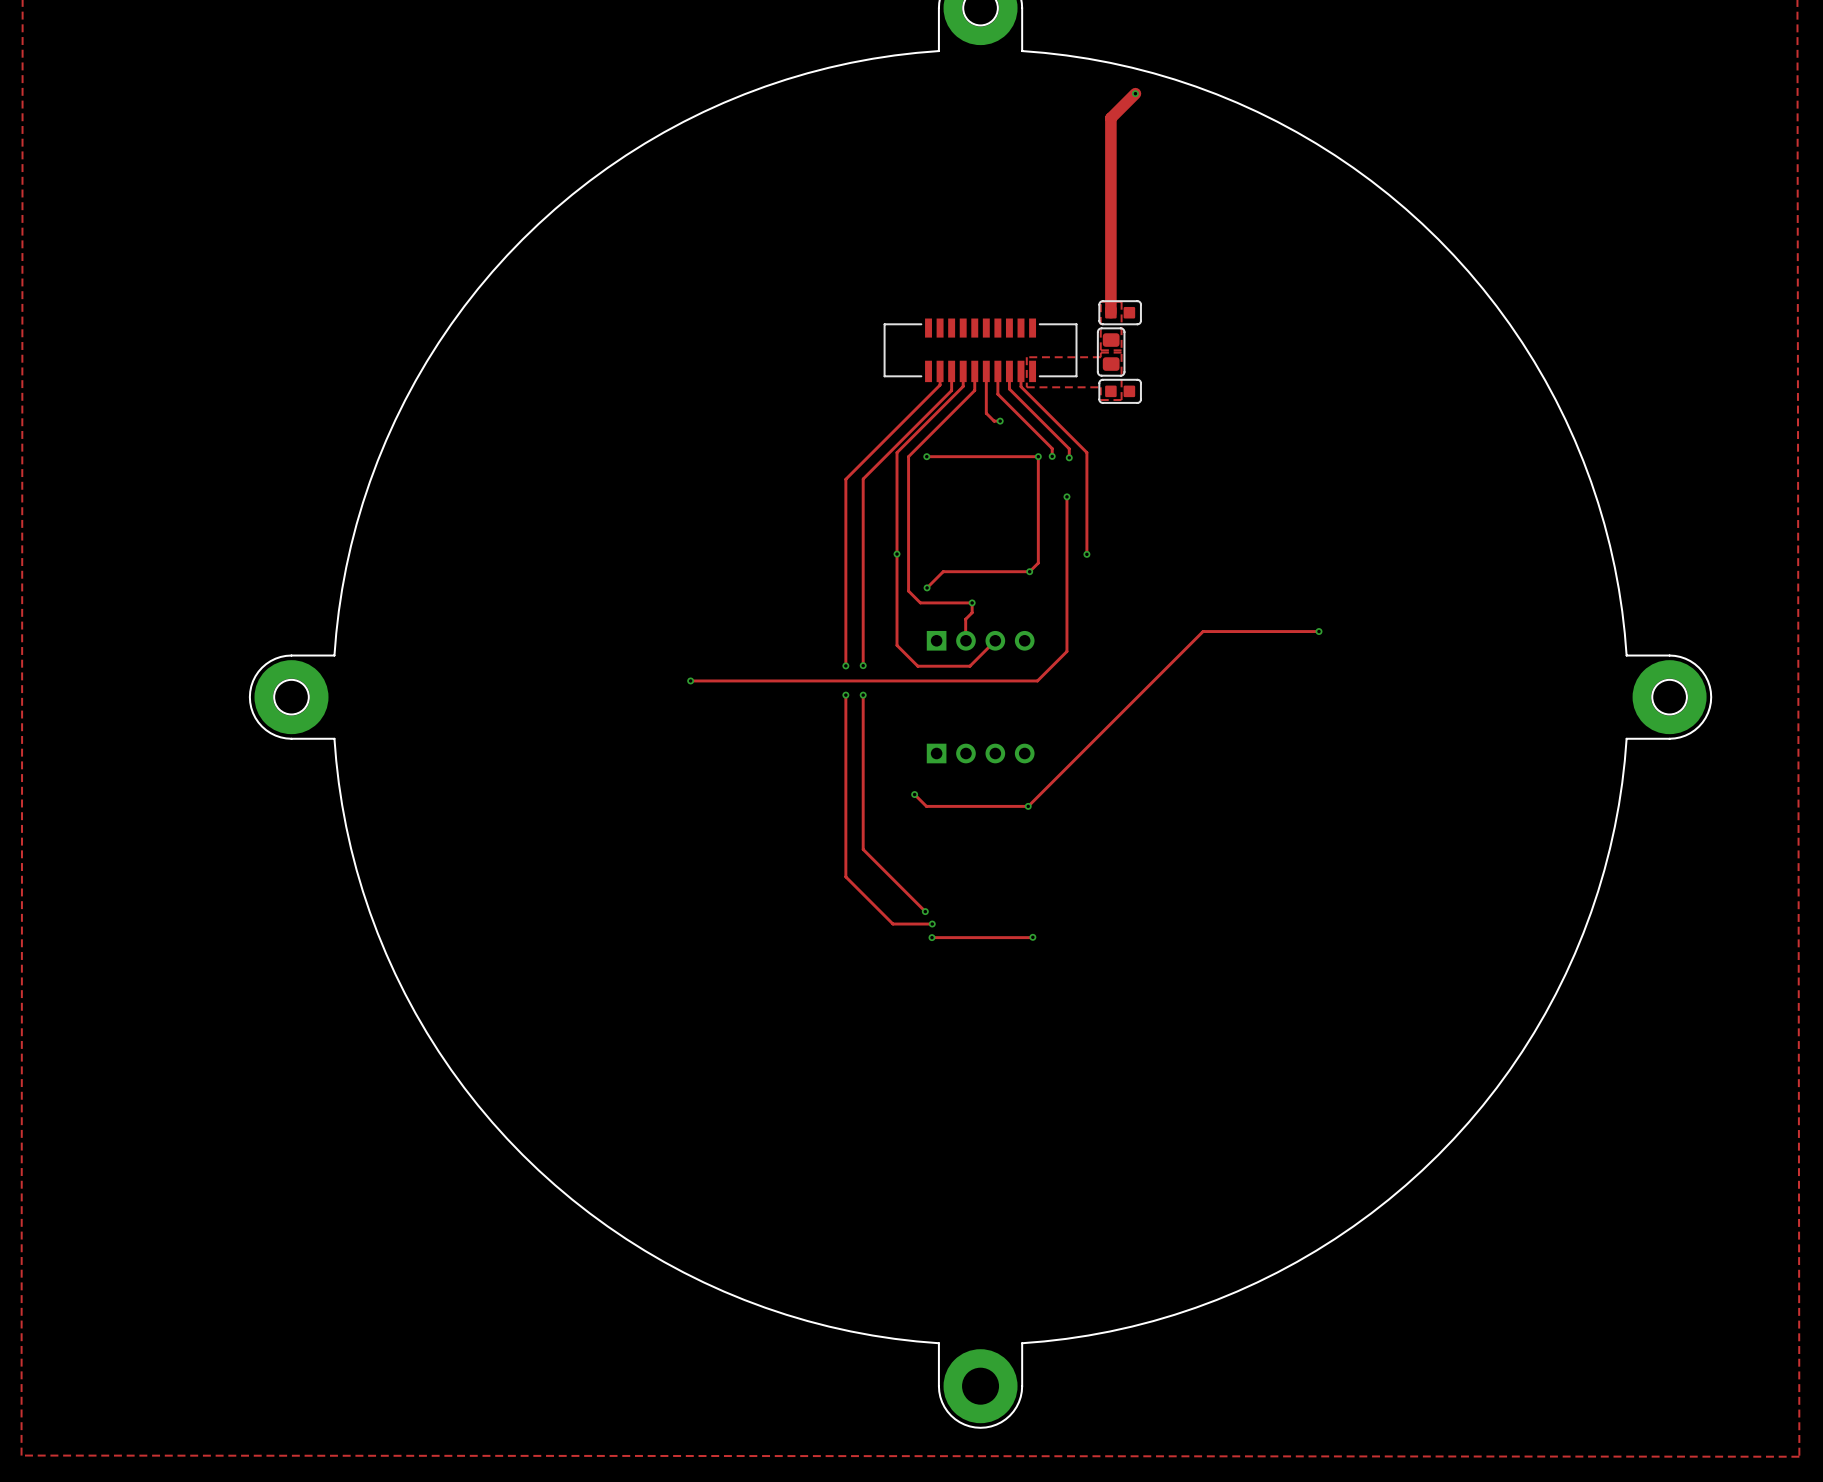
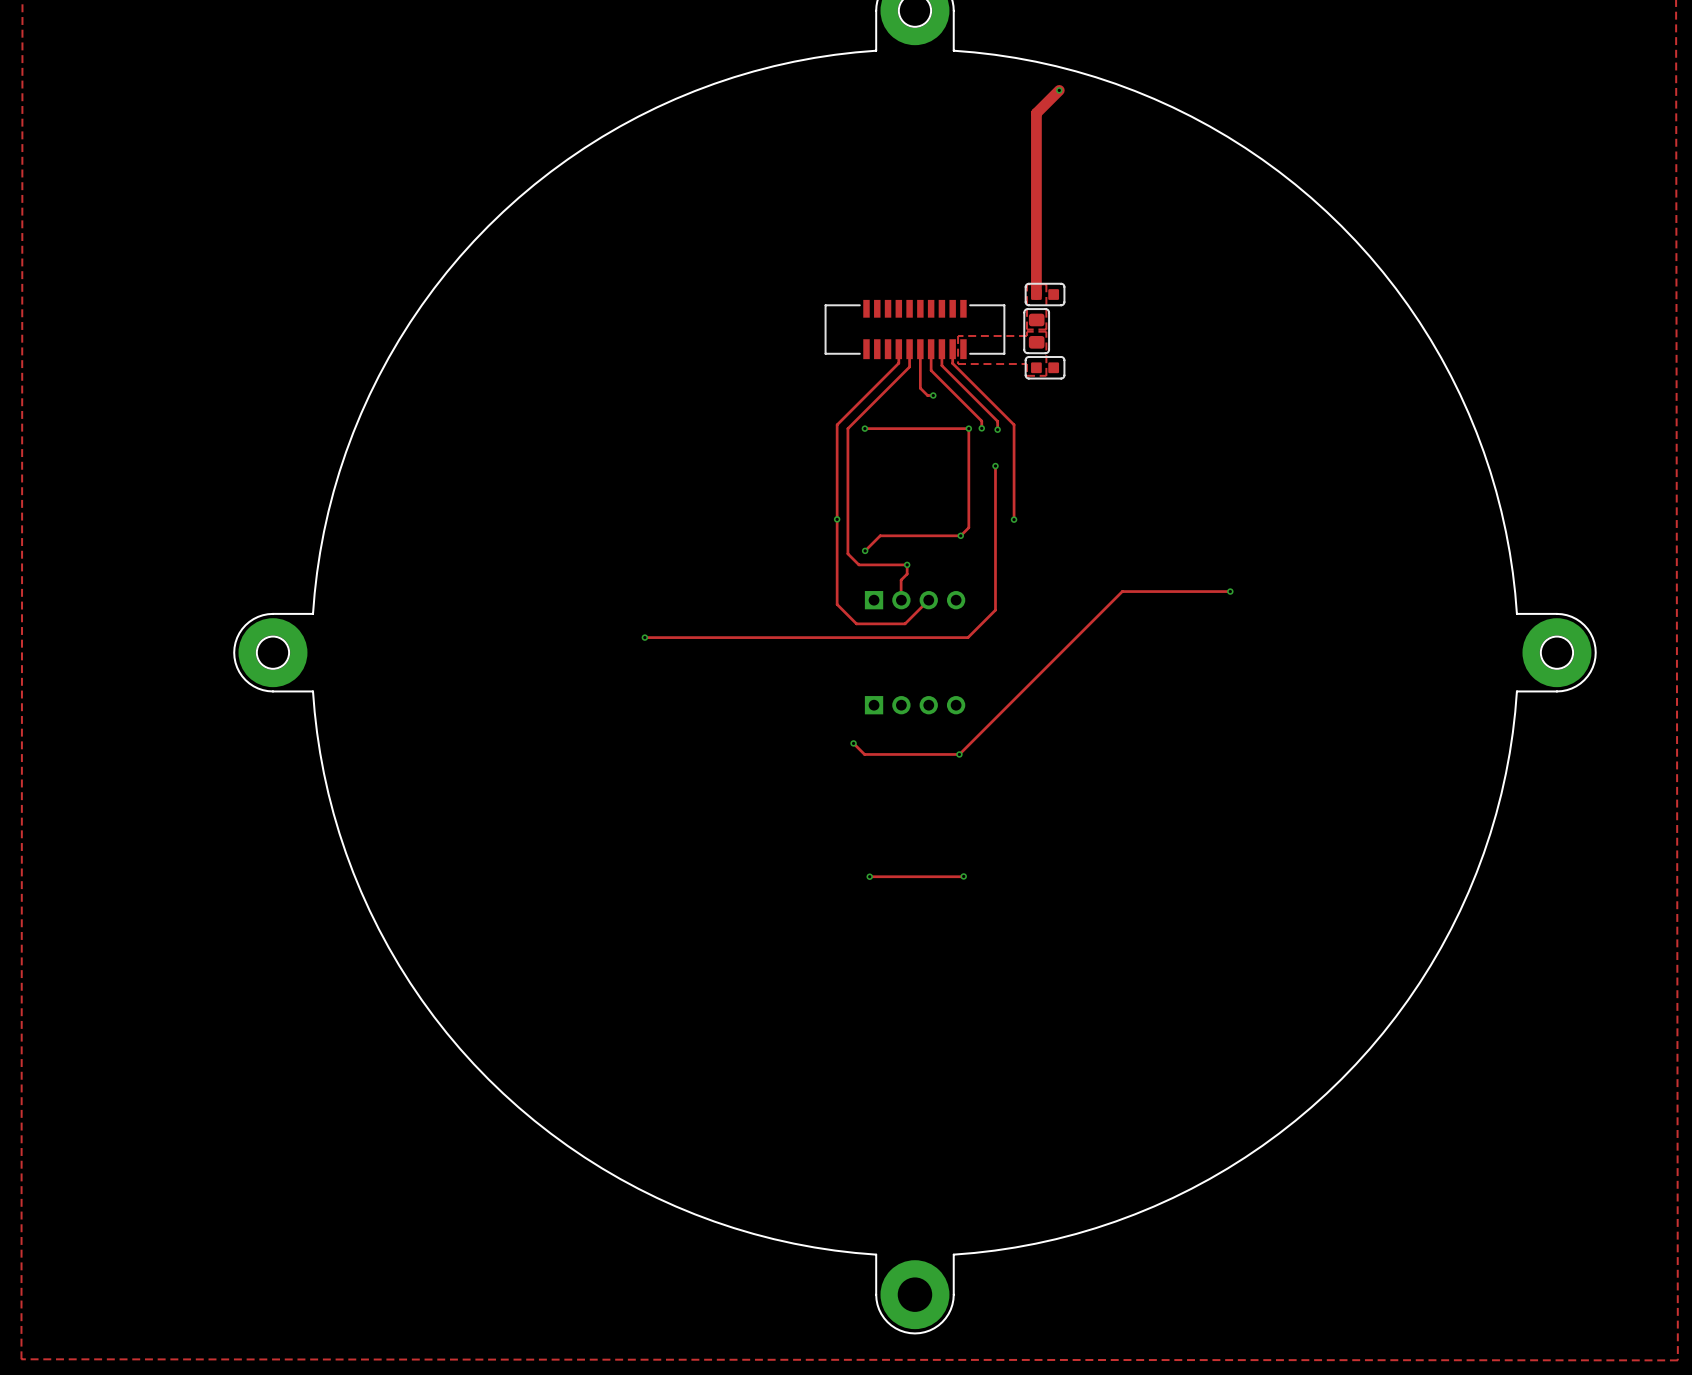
track: (940, 371) (940, 385) (845, 479) (845, 665) -> none
track: (951, 371) (951, 390) (863, 479) (863, 665) -> none
via: (845, 665) -> none
via: (863, 665) -> none
track: (845, 695) (845, 876) (892, 924) (932, 924) -> none
via: (845, 695) -> none
track: (863, 695) (863, 849) (925, 911) -> none
via: (863, 695) -> none
via: (925, 911) -> none
via: (932, 924) -> none

